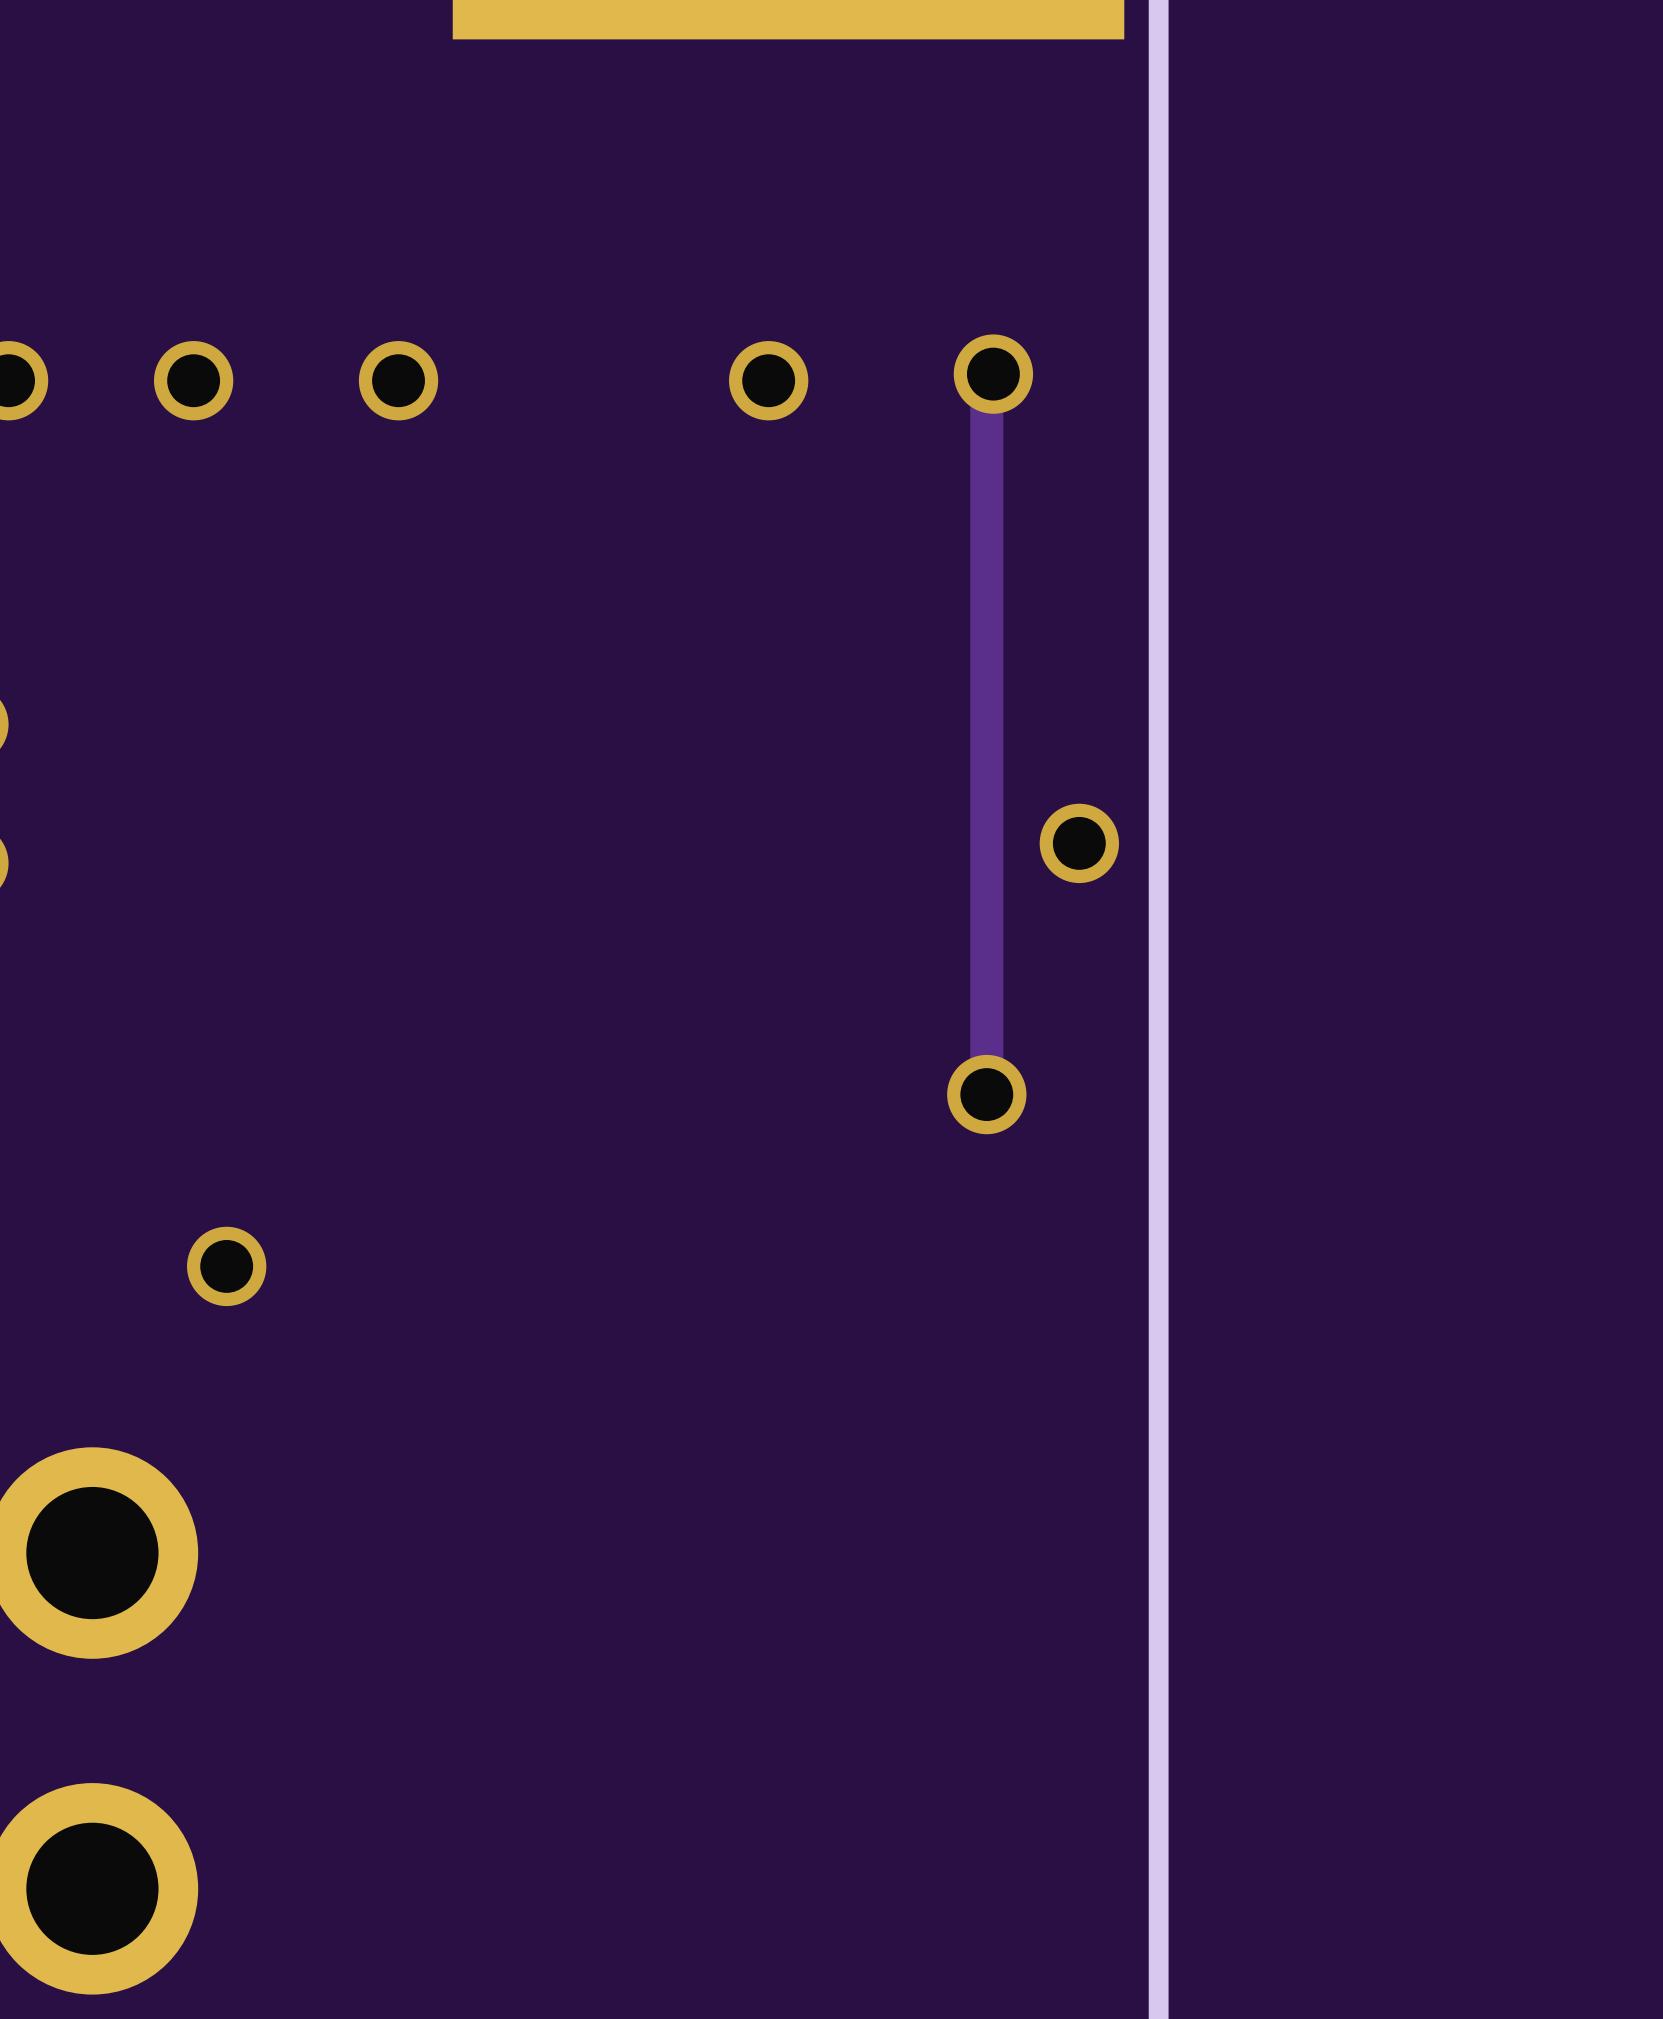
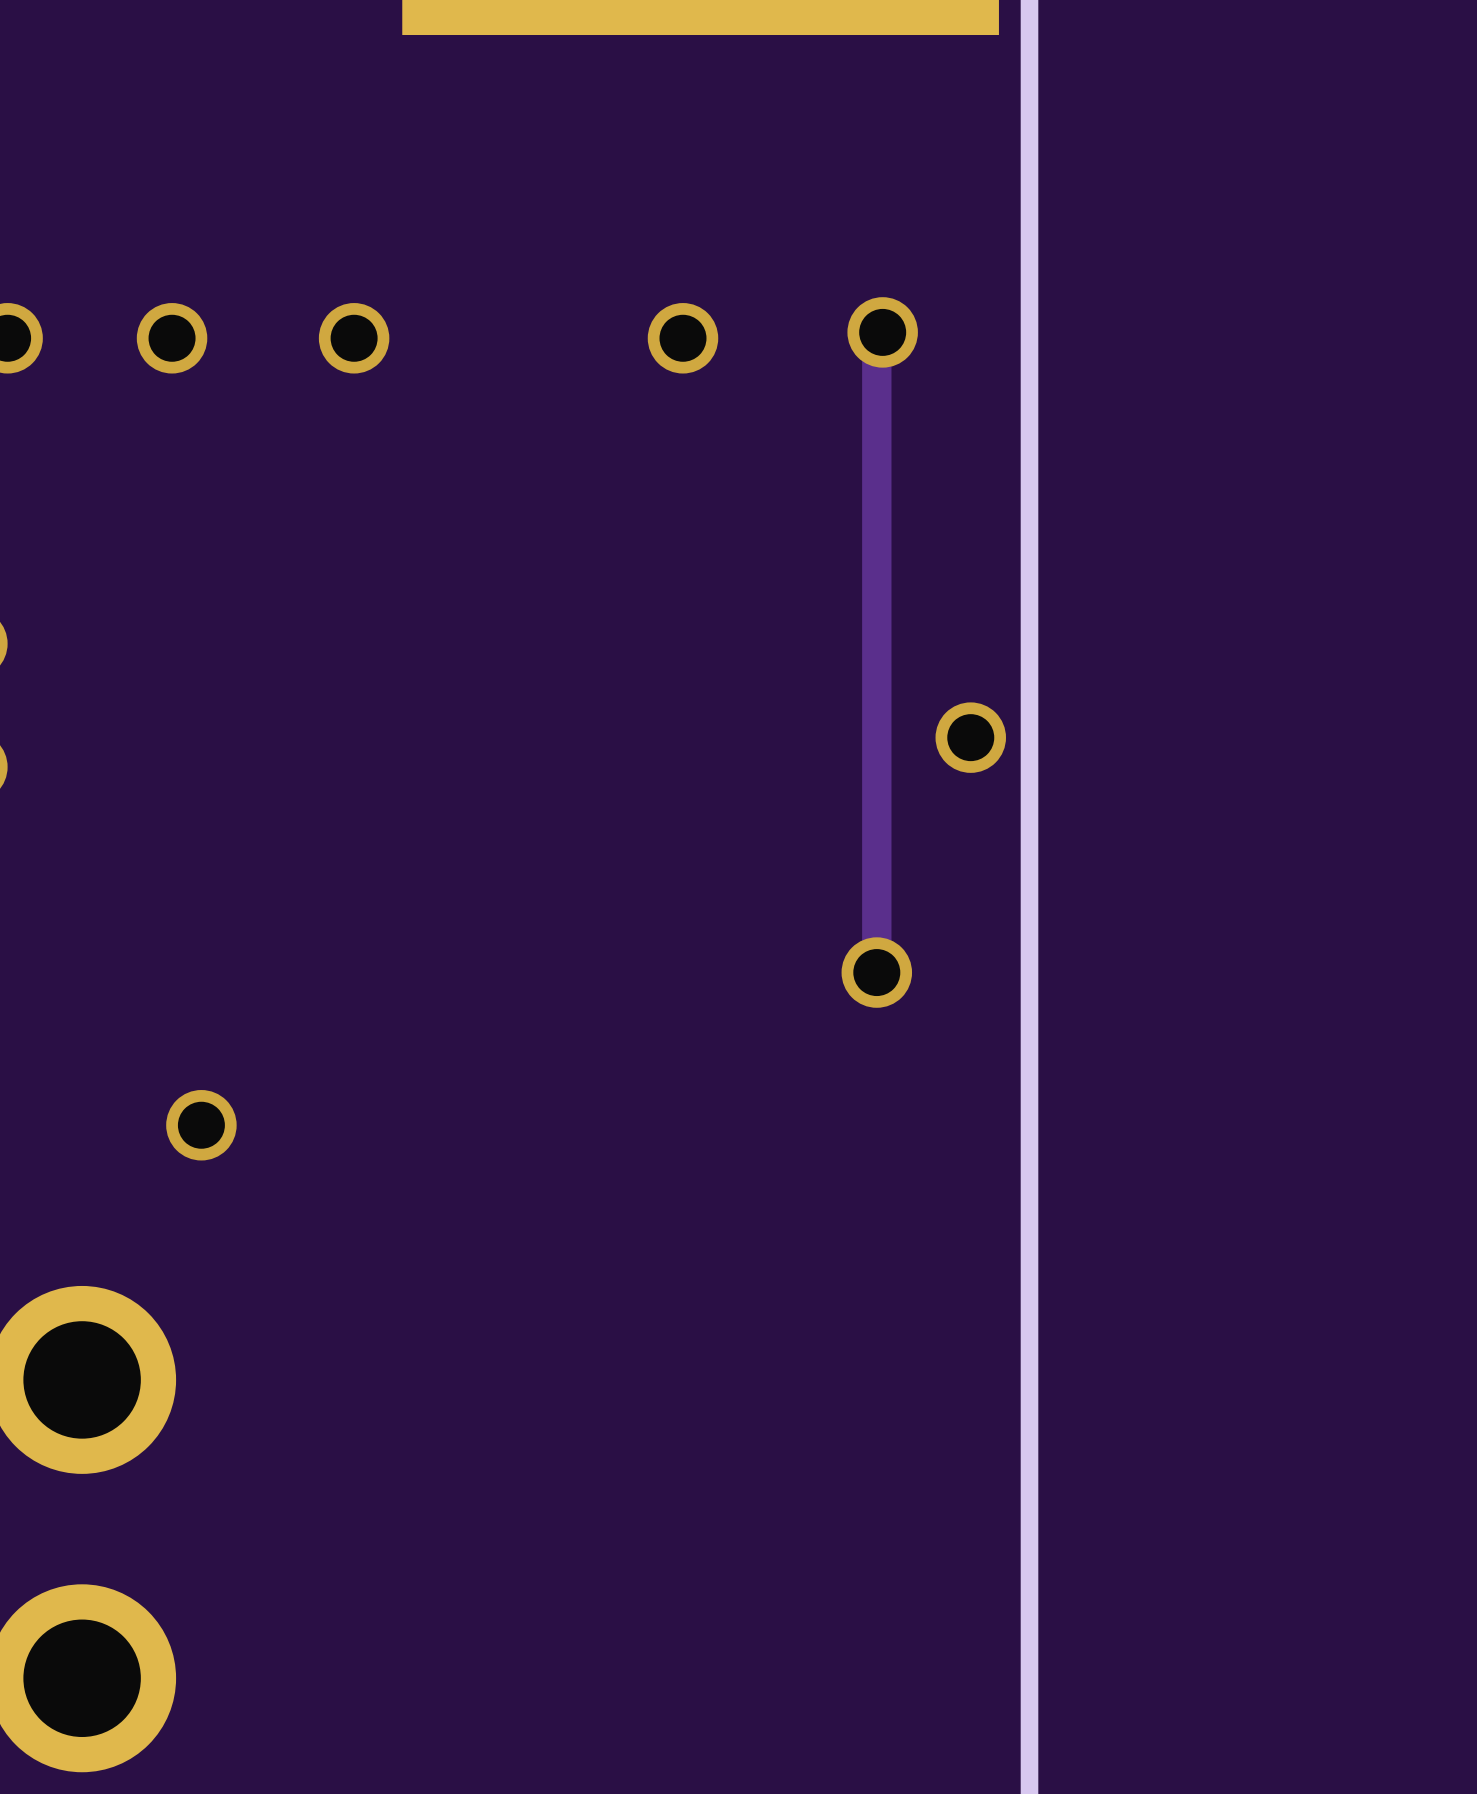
via position: (1079, 843) -> (970, 737)

